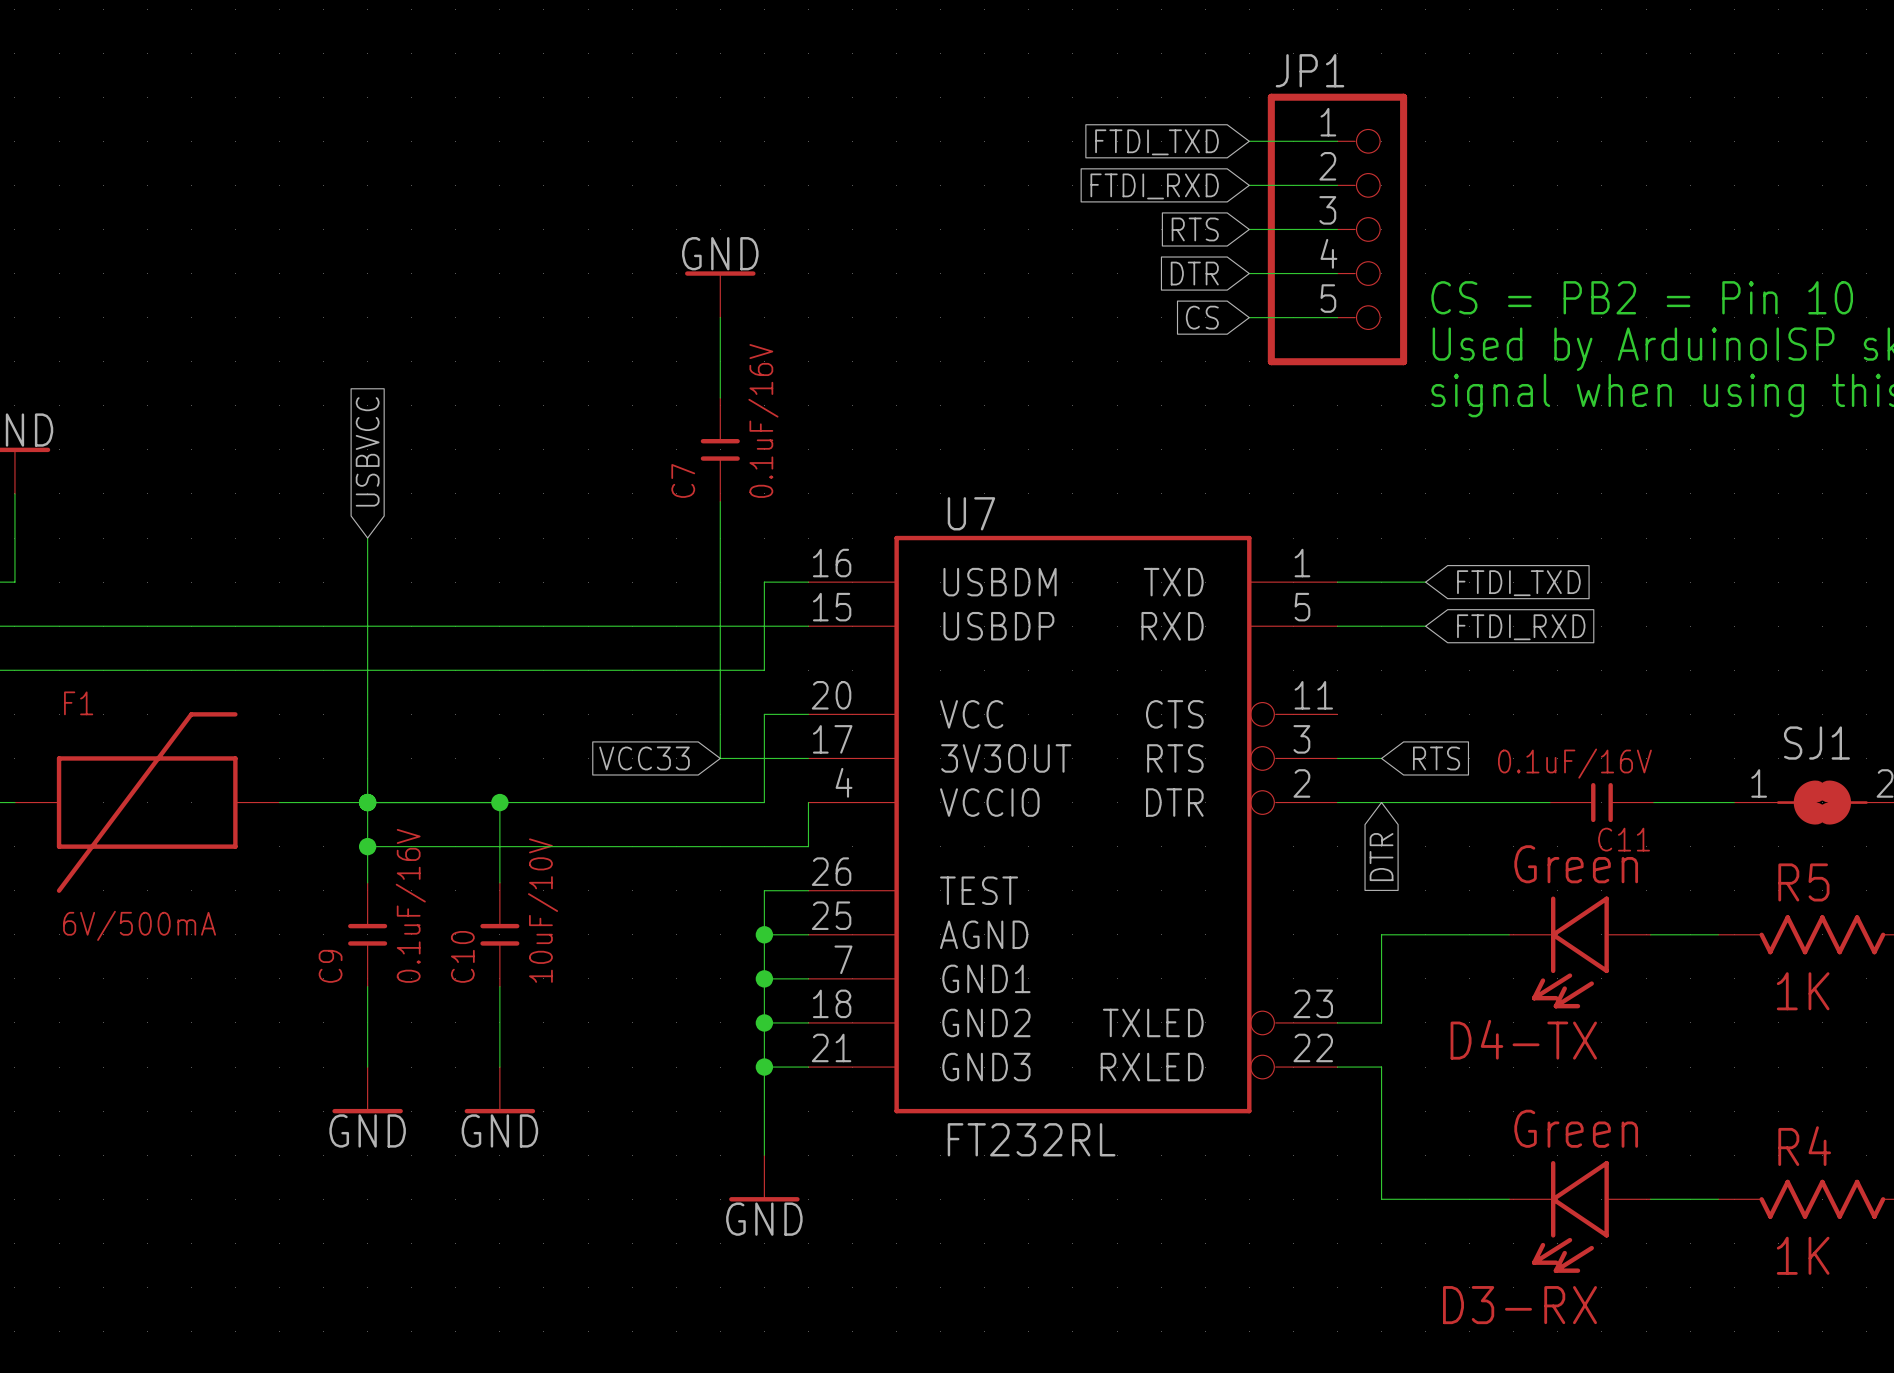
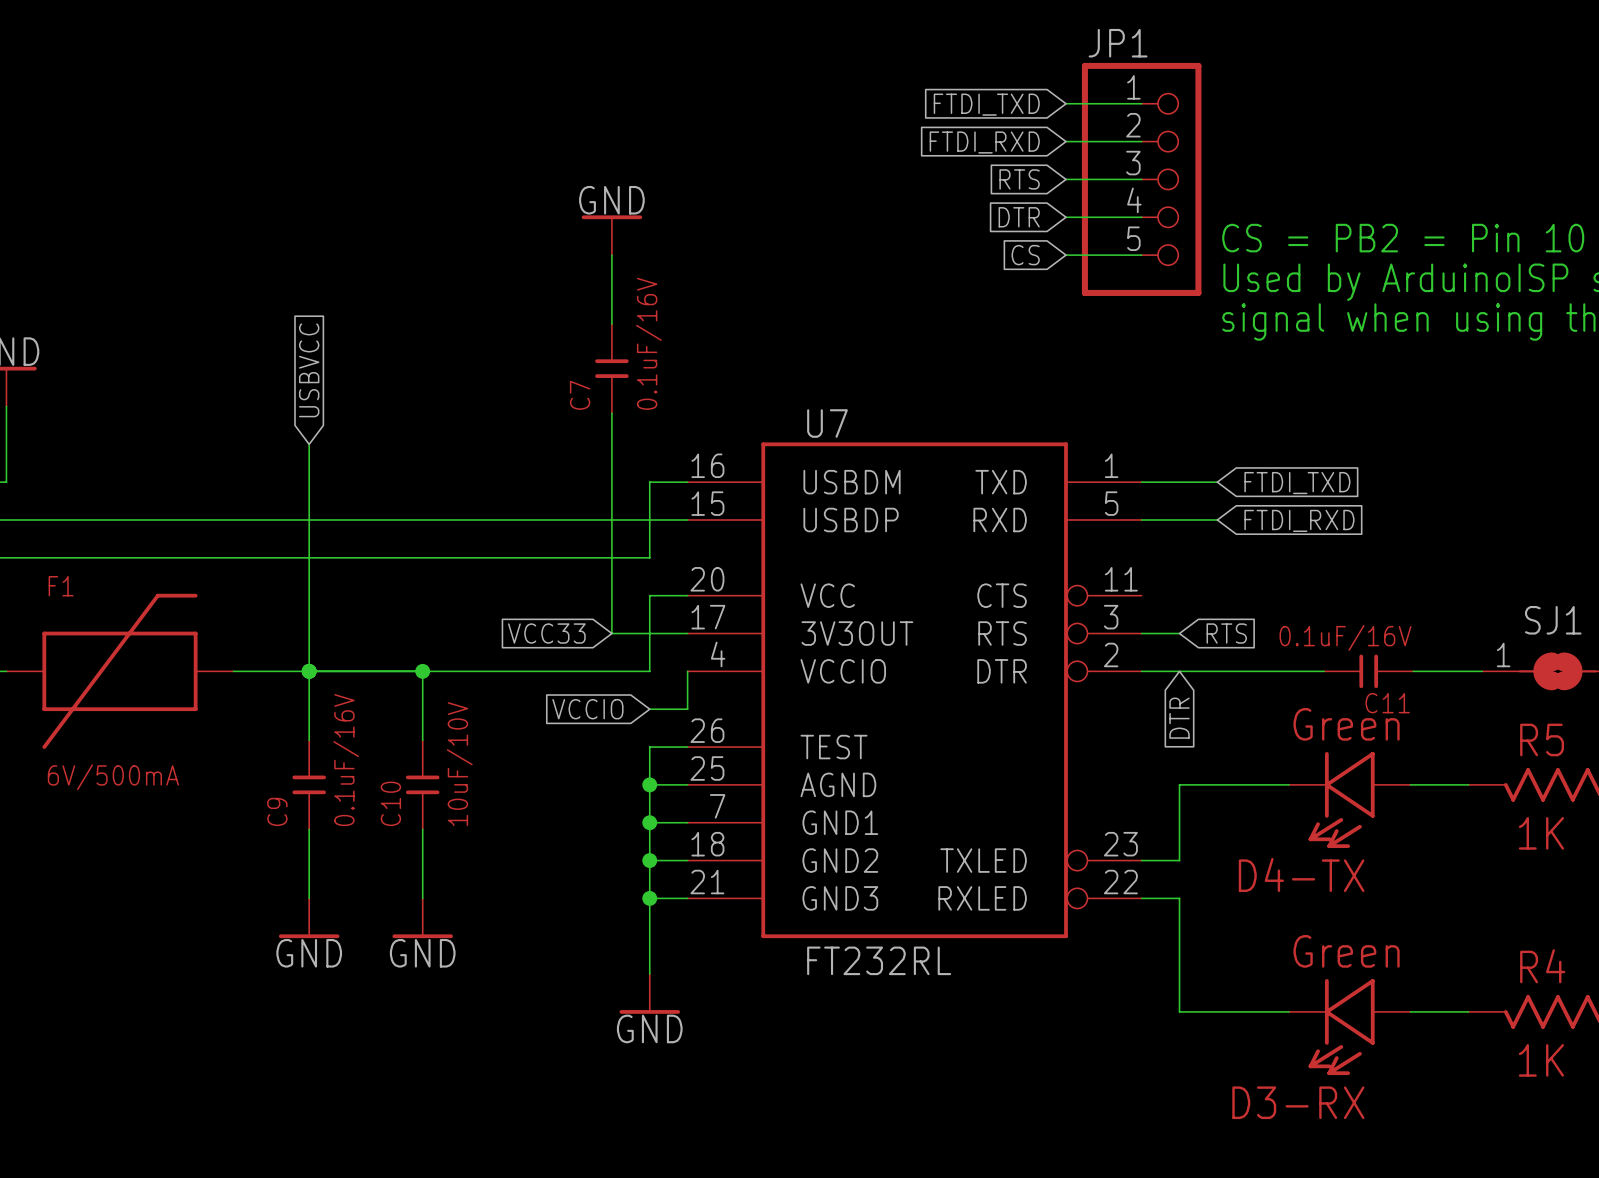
wire: (367, 846) (764, 846) -> none
junction: (367, 846) -> none
global label: none -> VCCIO (587, 709)

